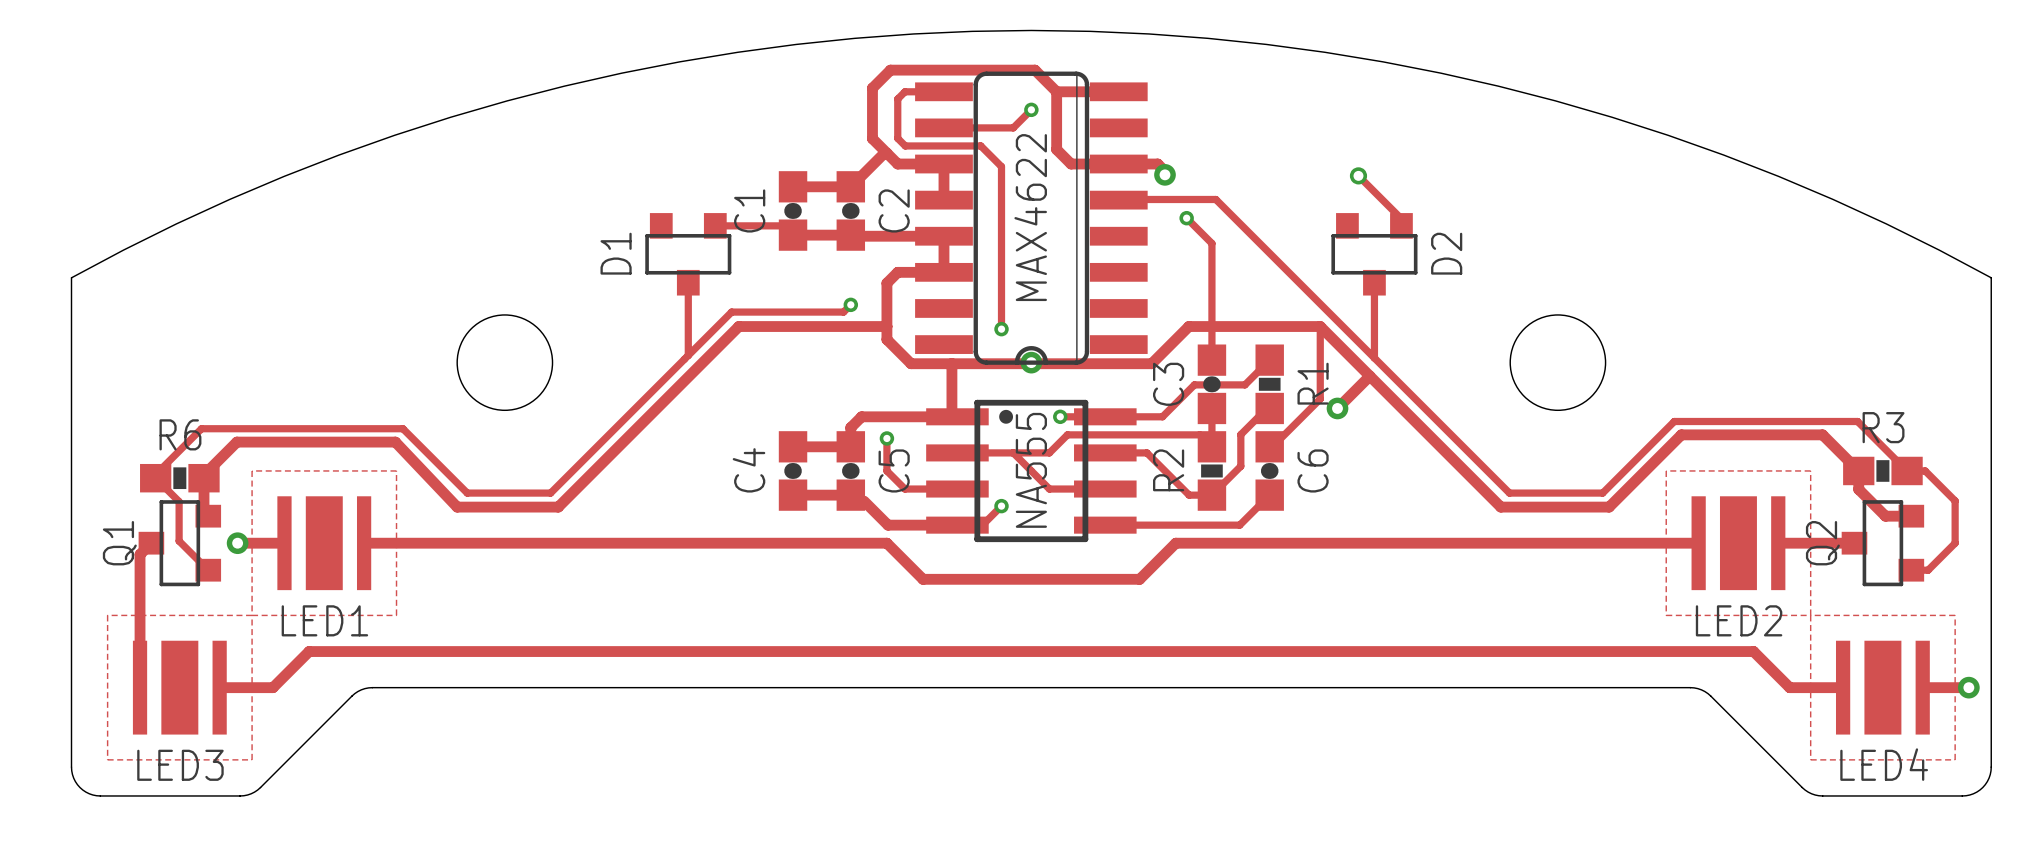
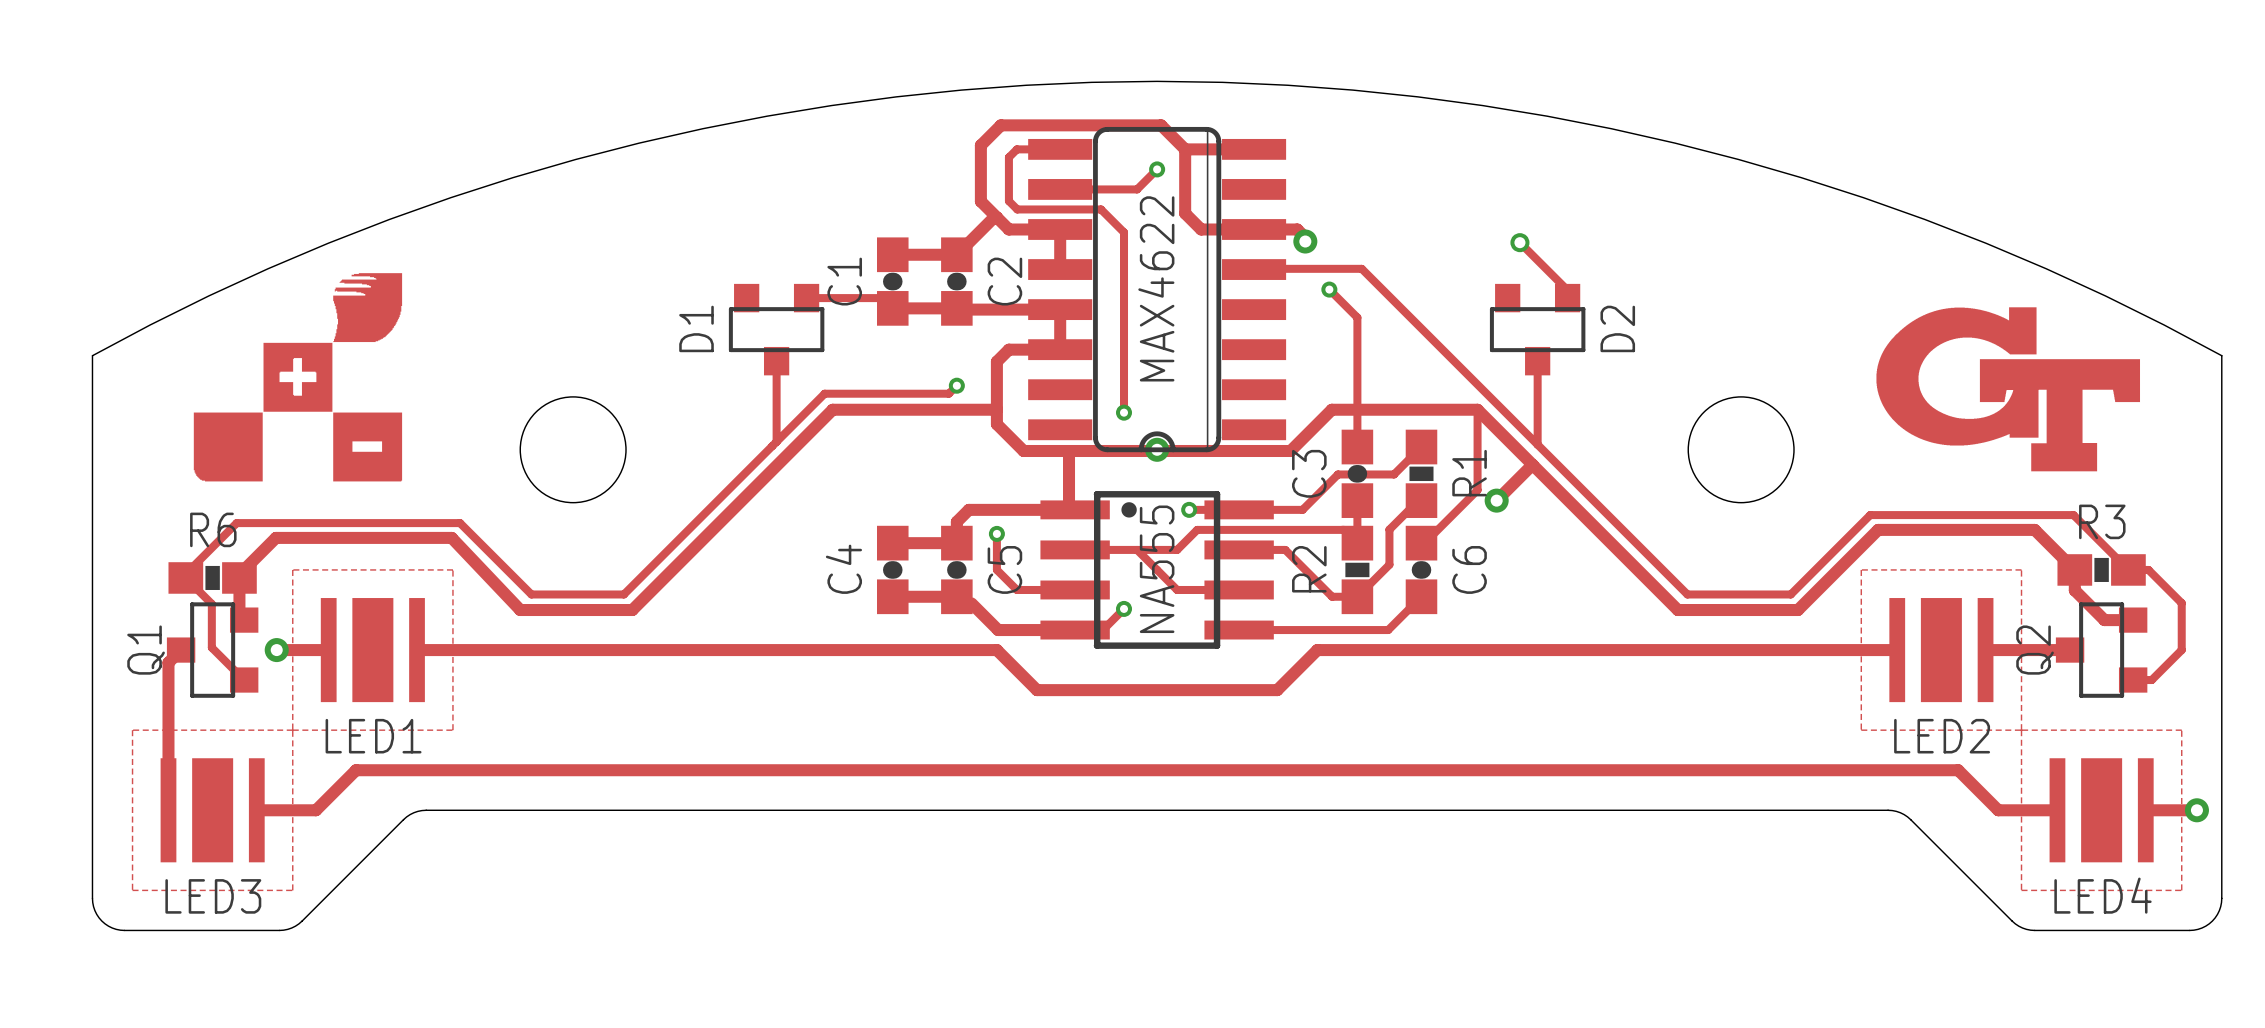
drawing: none -> [193, 273, 403, 482]
drawing: none -> [1876, 307, 2141, 472]

